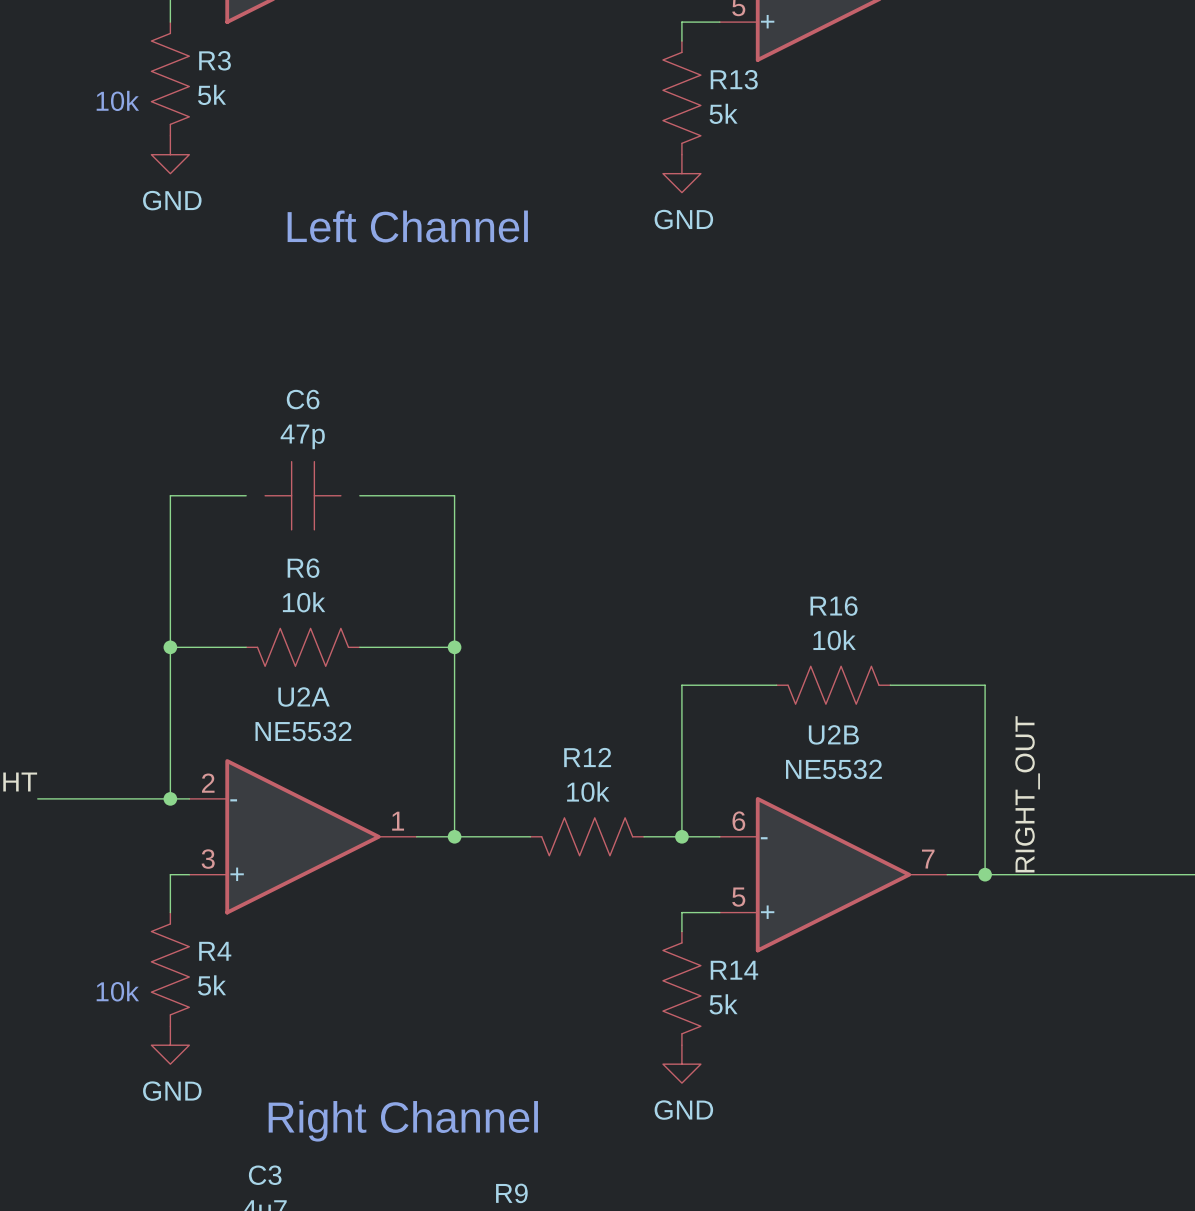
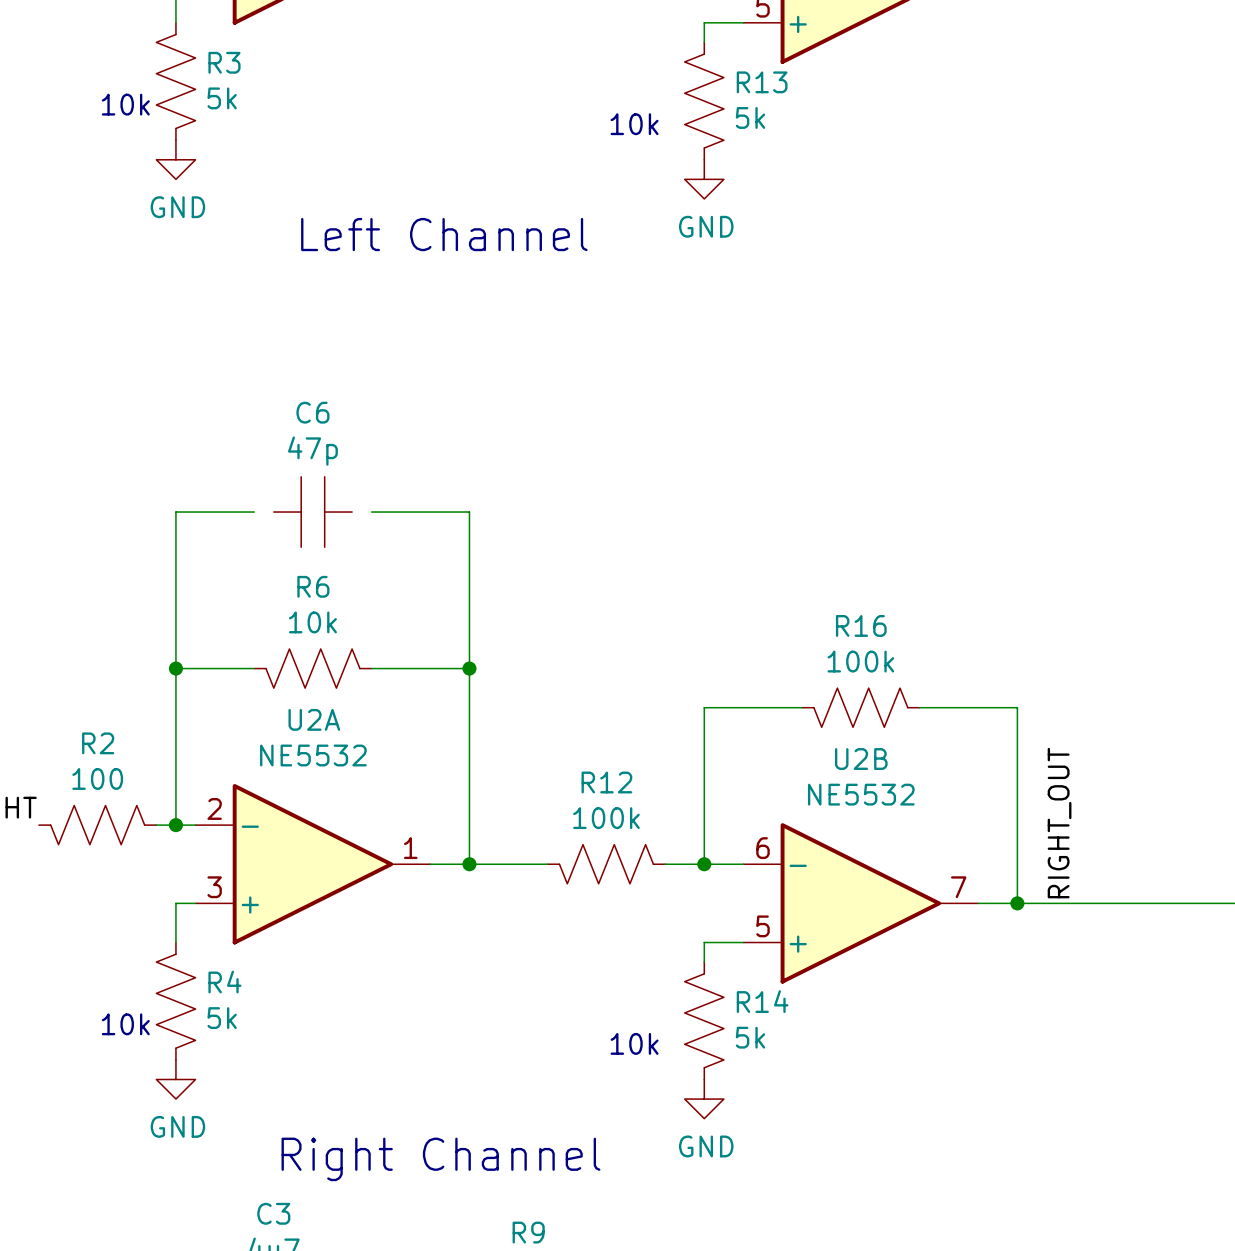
text: none -> 10k (634, 124)
R16 value: 10k (834, 640) -> 100k (860, 661)
R12 value: 10k (588, 791) -> 100k (606, 818)
wire: (37, 798) (151, 798) -> none
R2: none -> 100 (97, 825)
text: none -> 10k (634, 1043)

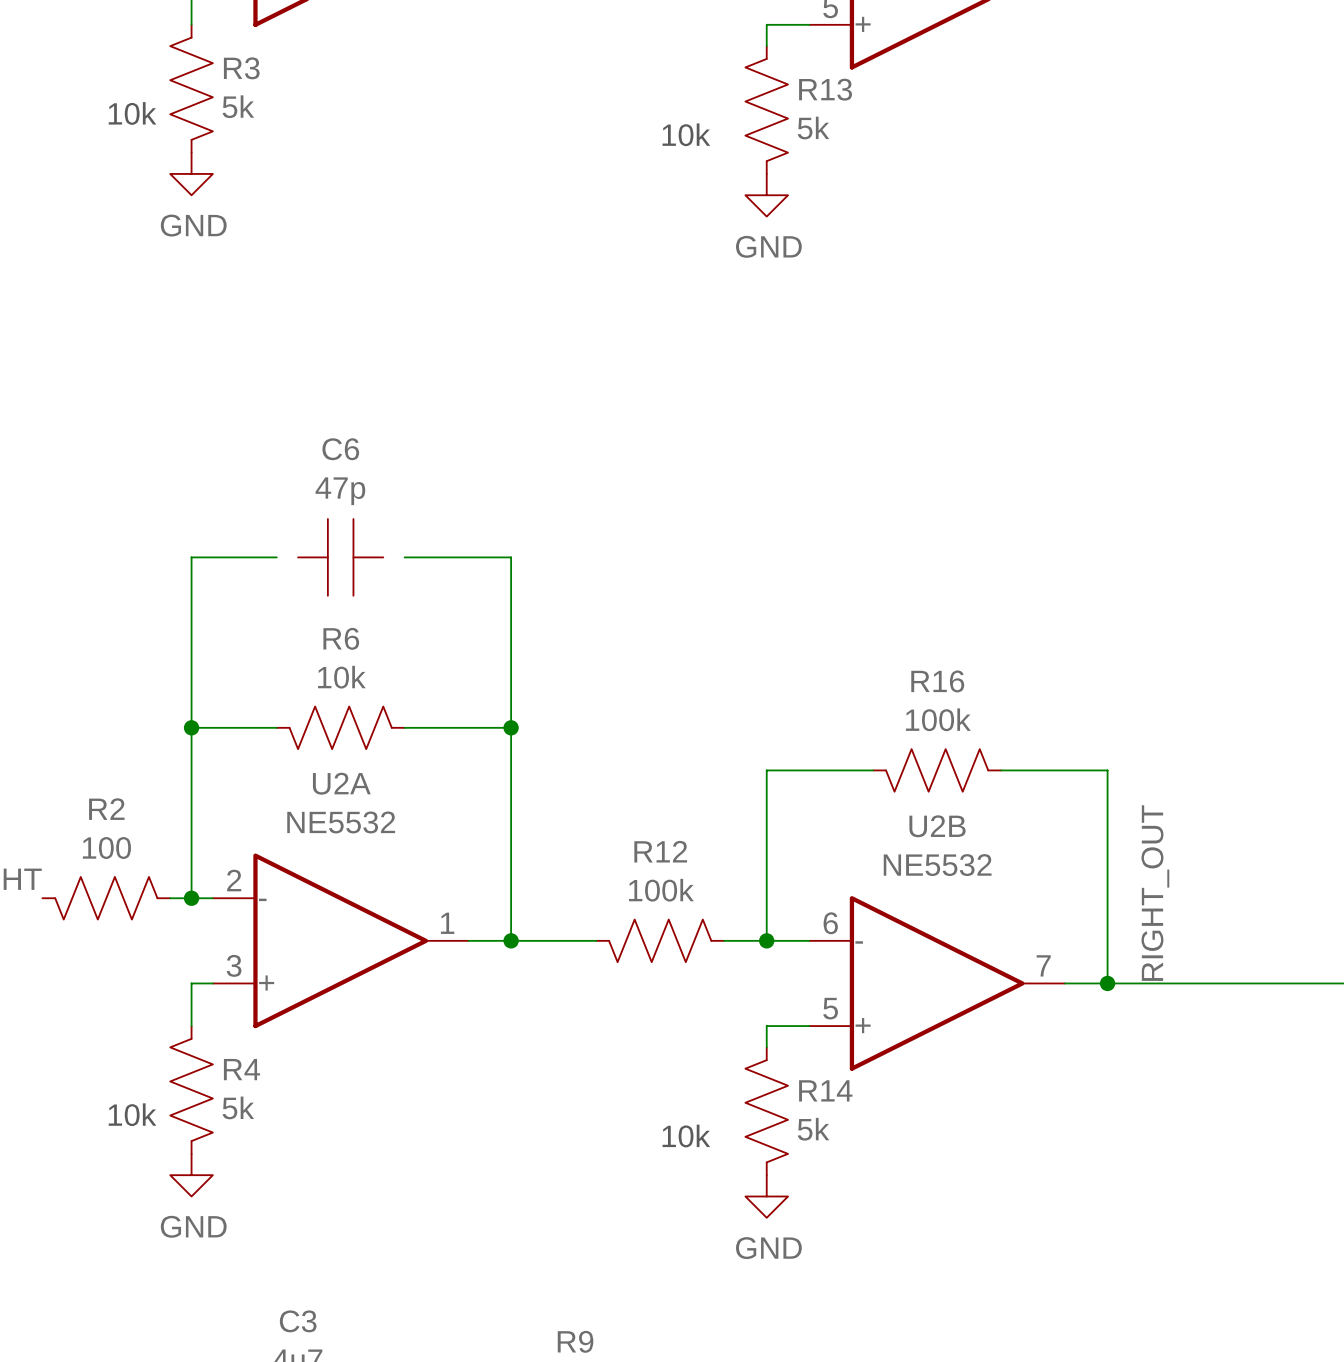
text: Left Channel (444, 234) -> none
text: Right Channel (440, 1159) -> none

